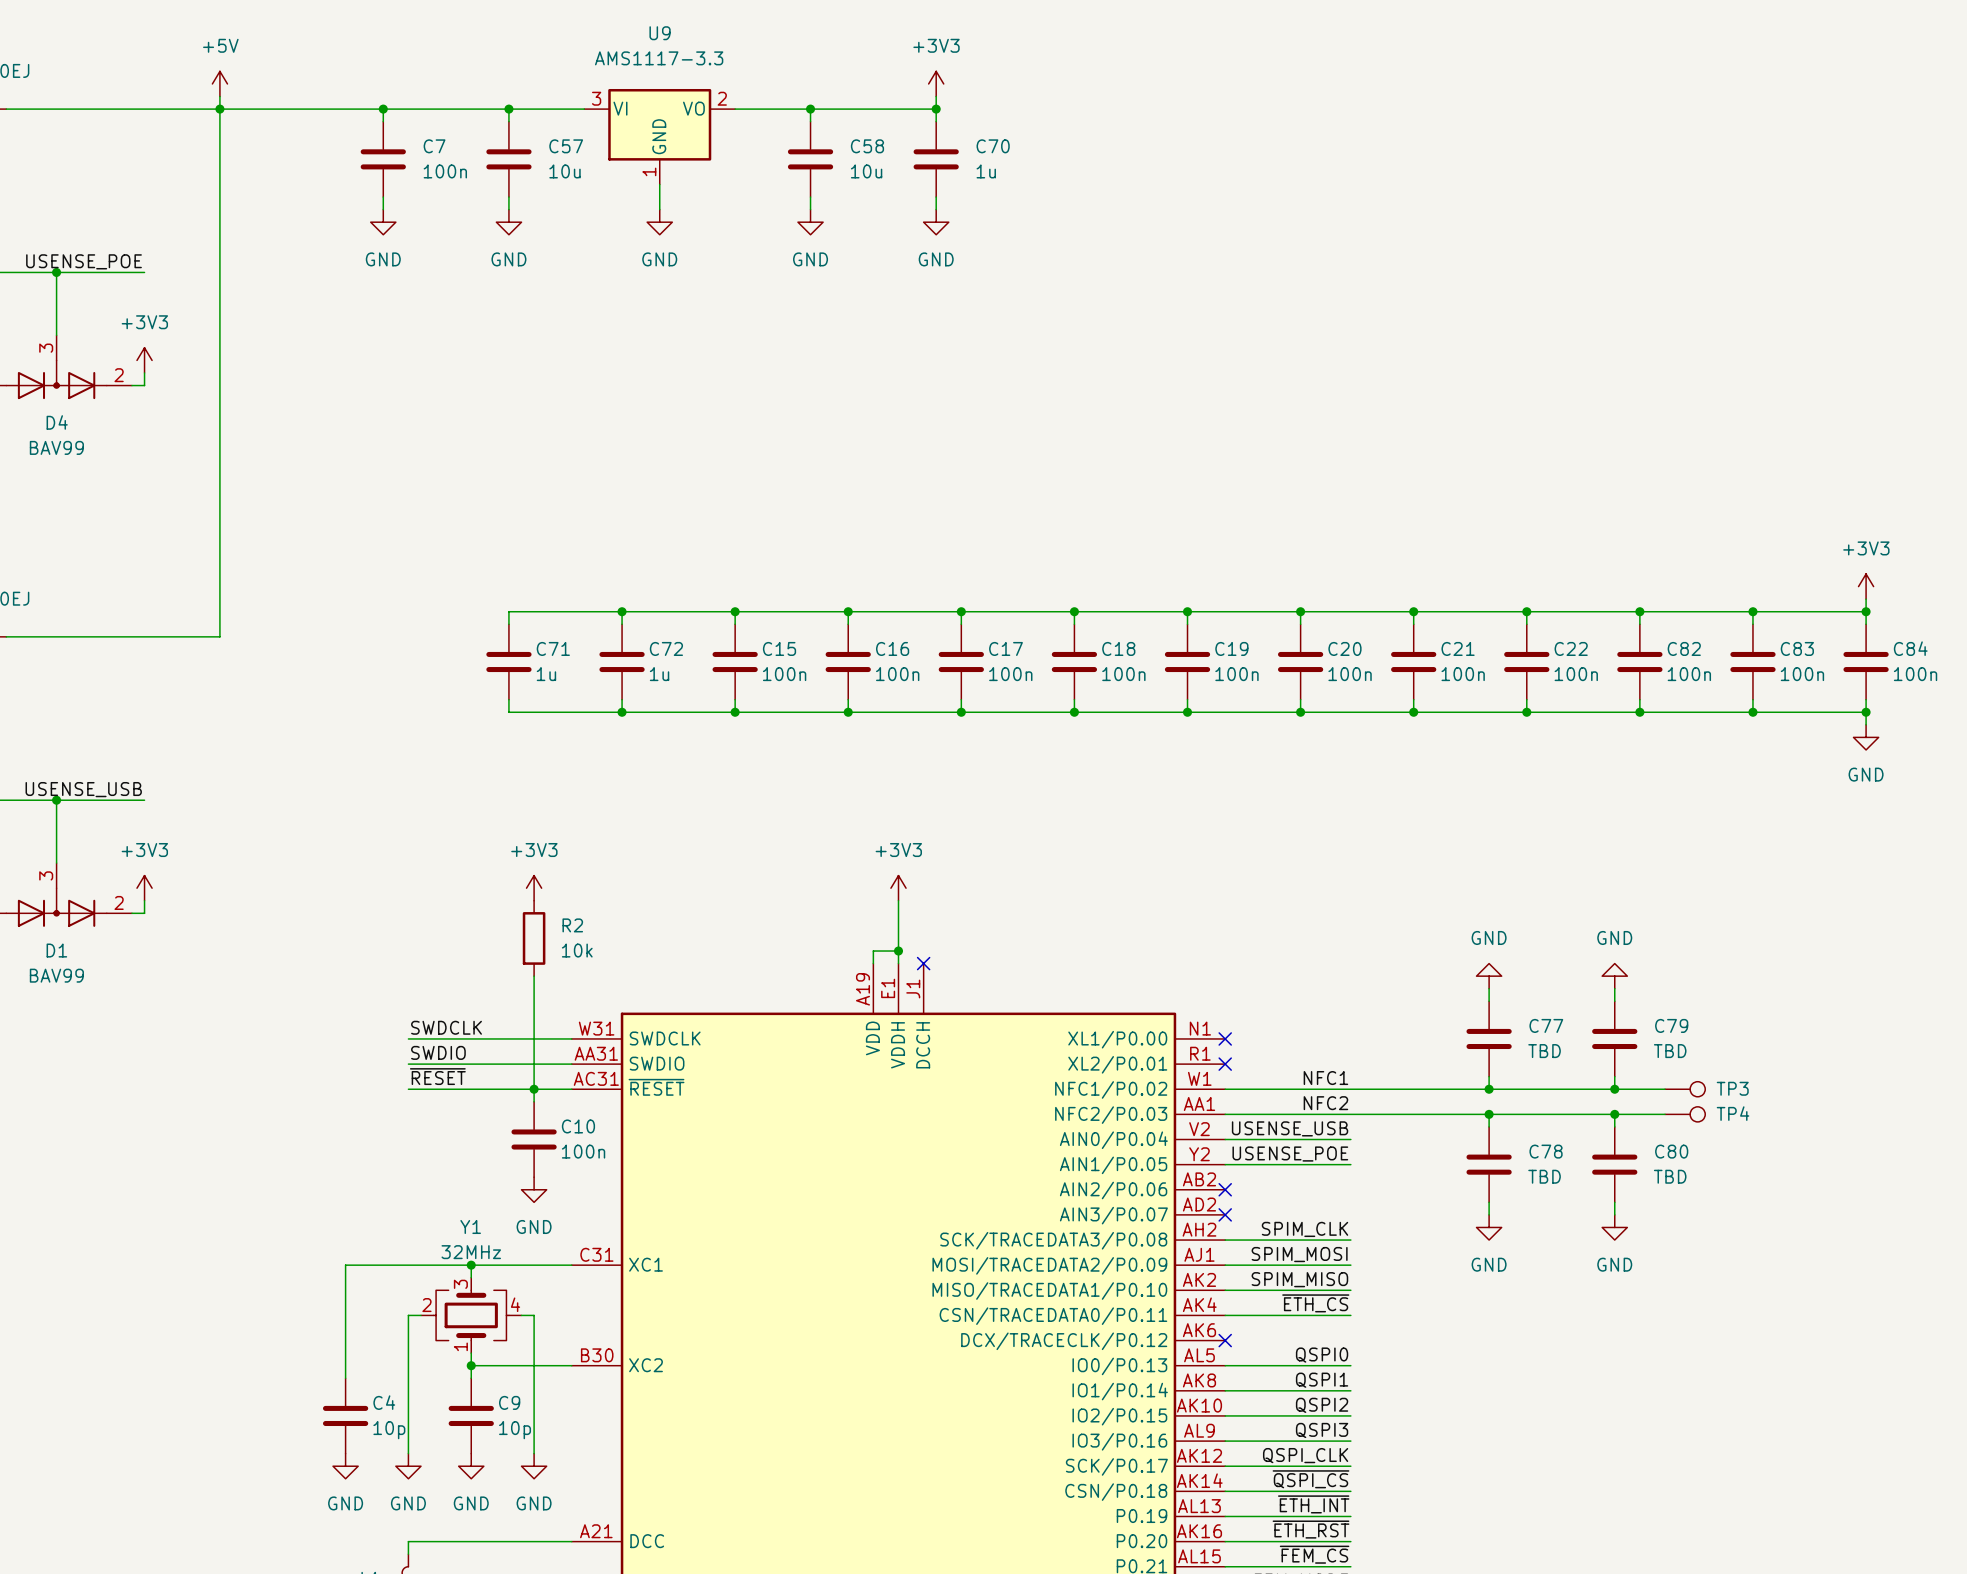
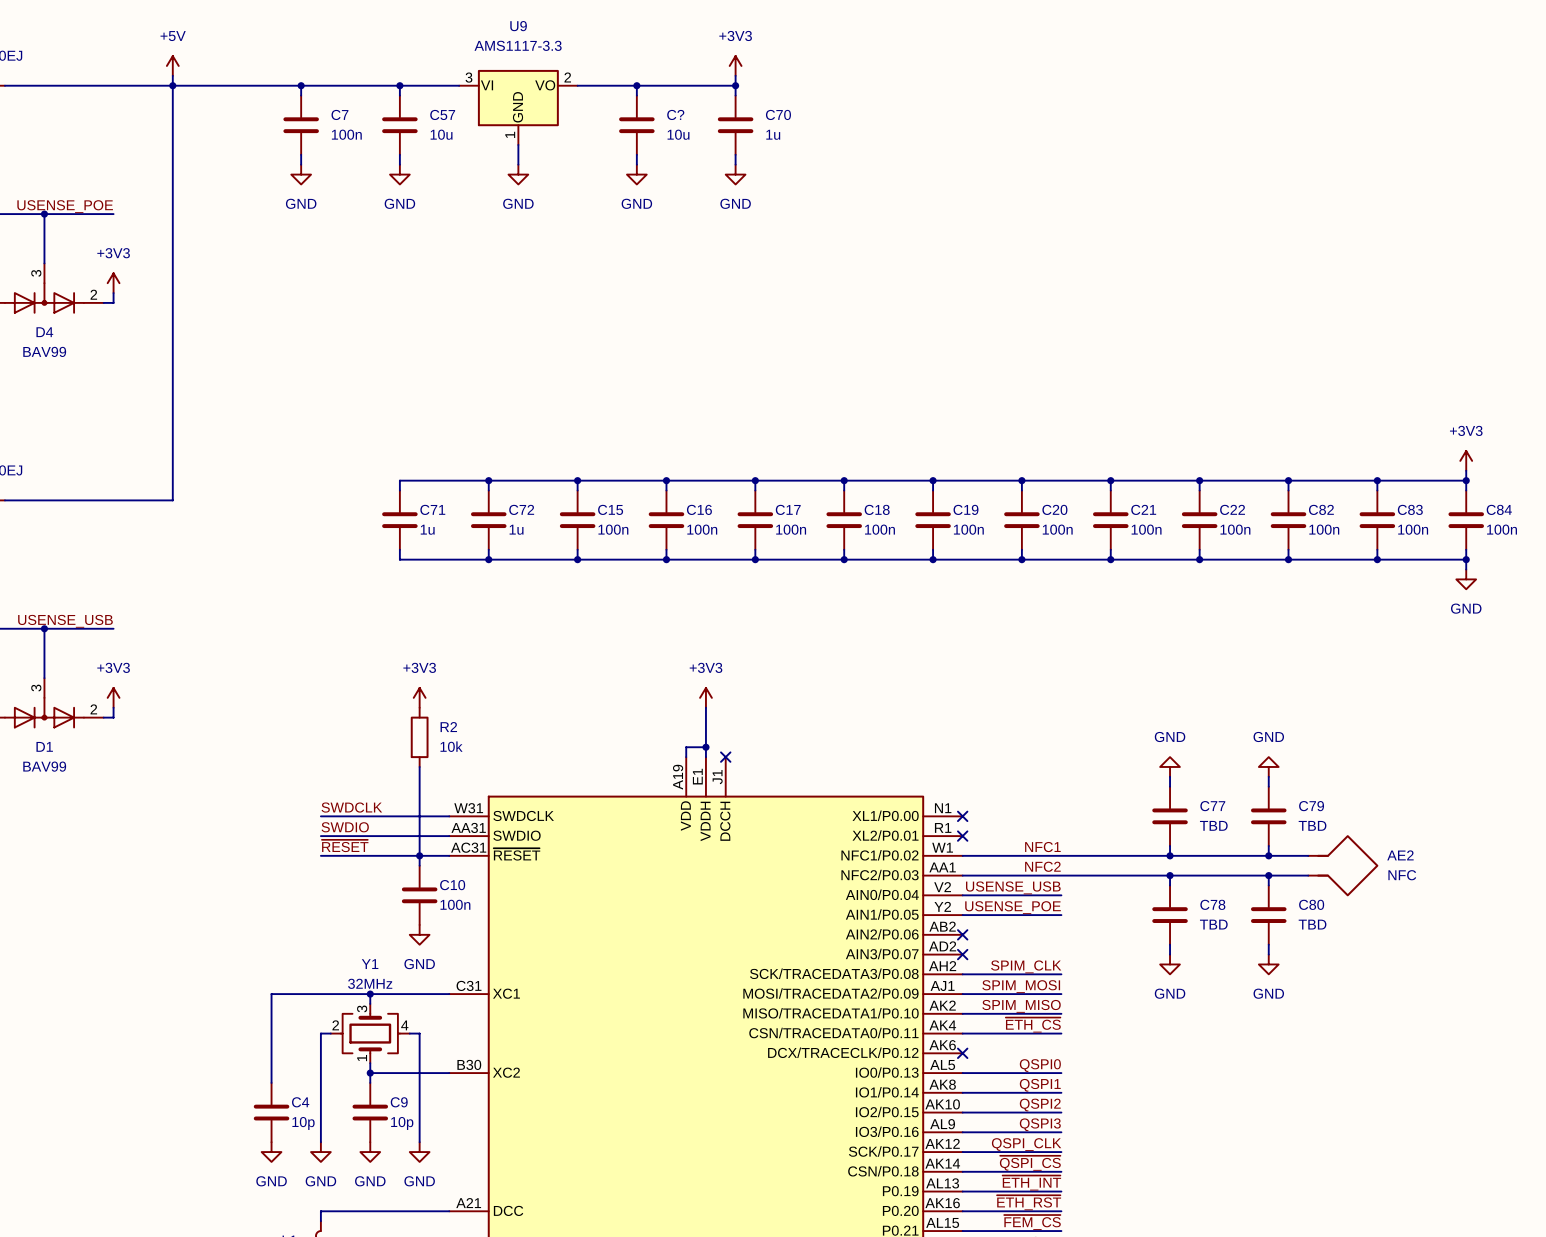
C58 name: C58 (867, 146) -> C? (675, 114)
TP3: (1685, 1089) -> none
AE2: none -> NFC (1343, 865)
TP4: (1685, 1114) -> none

